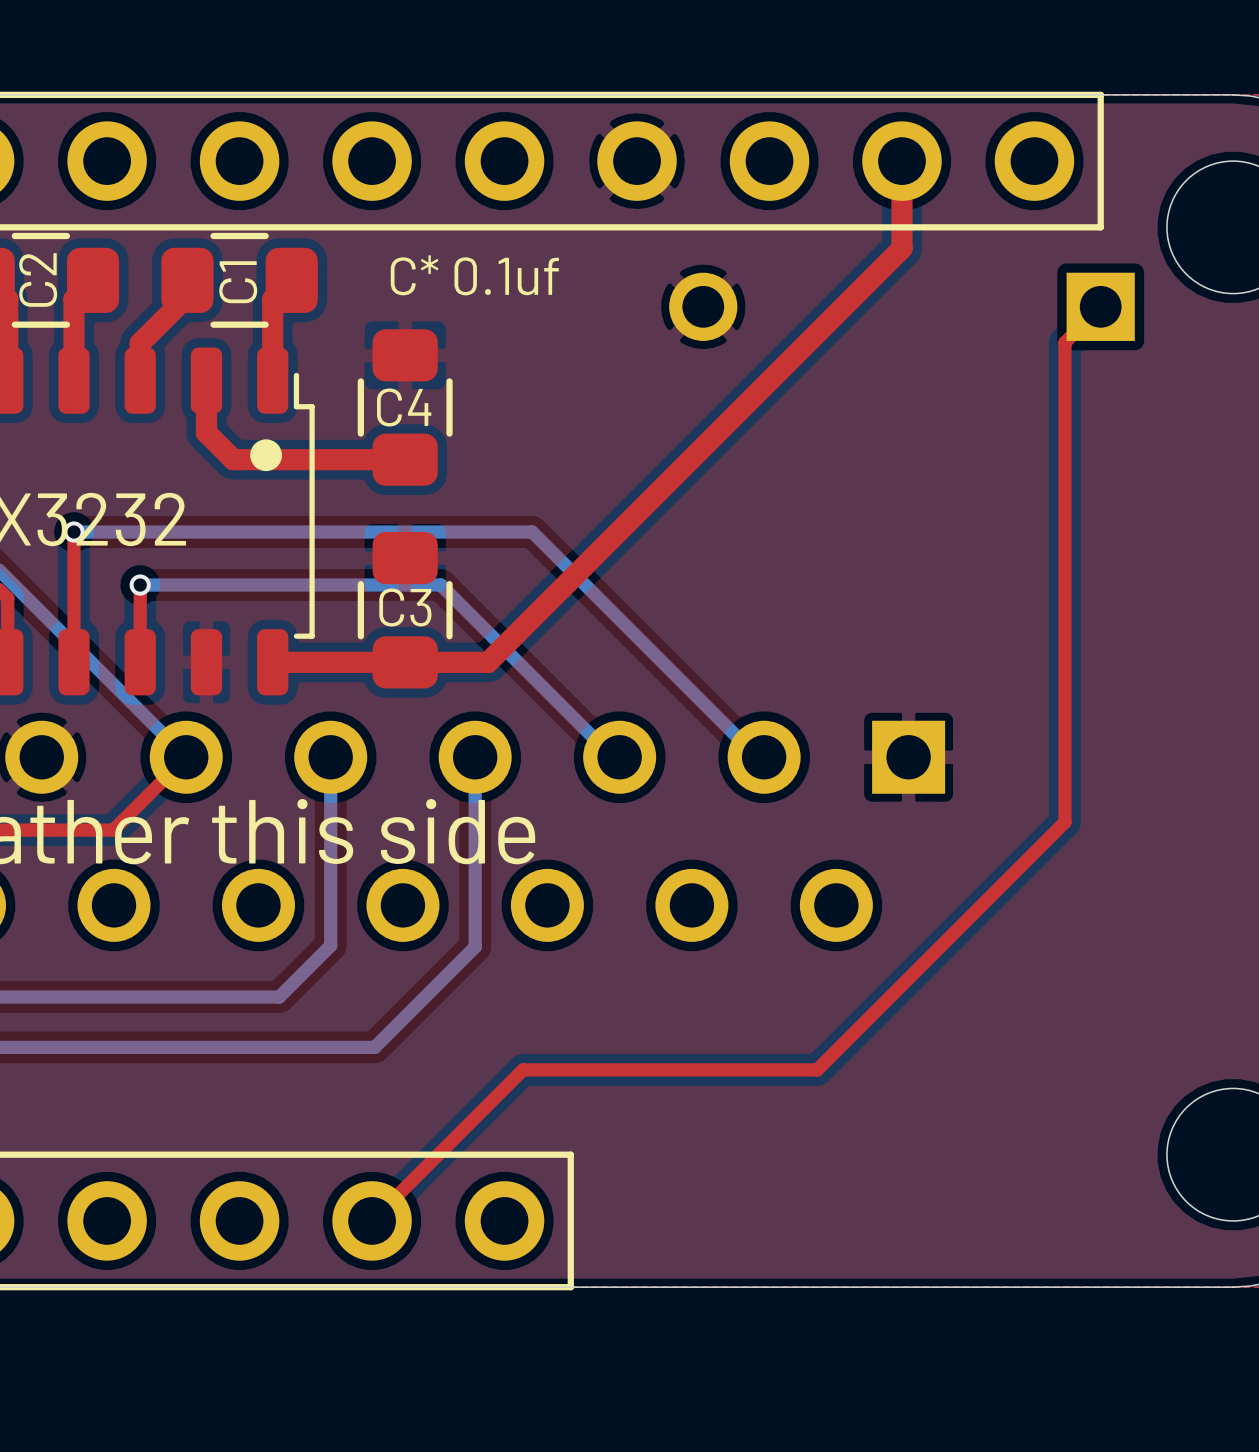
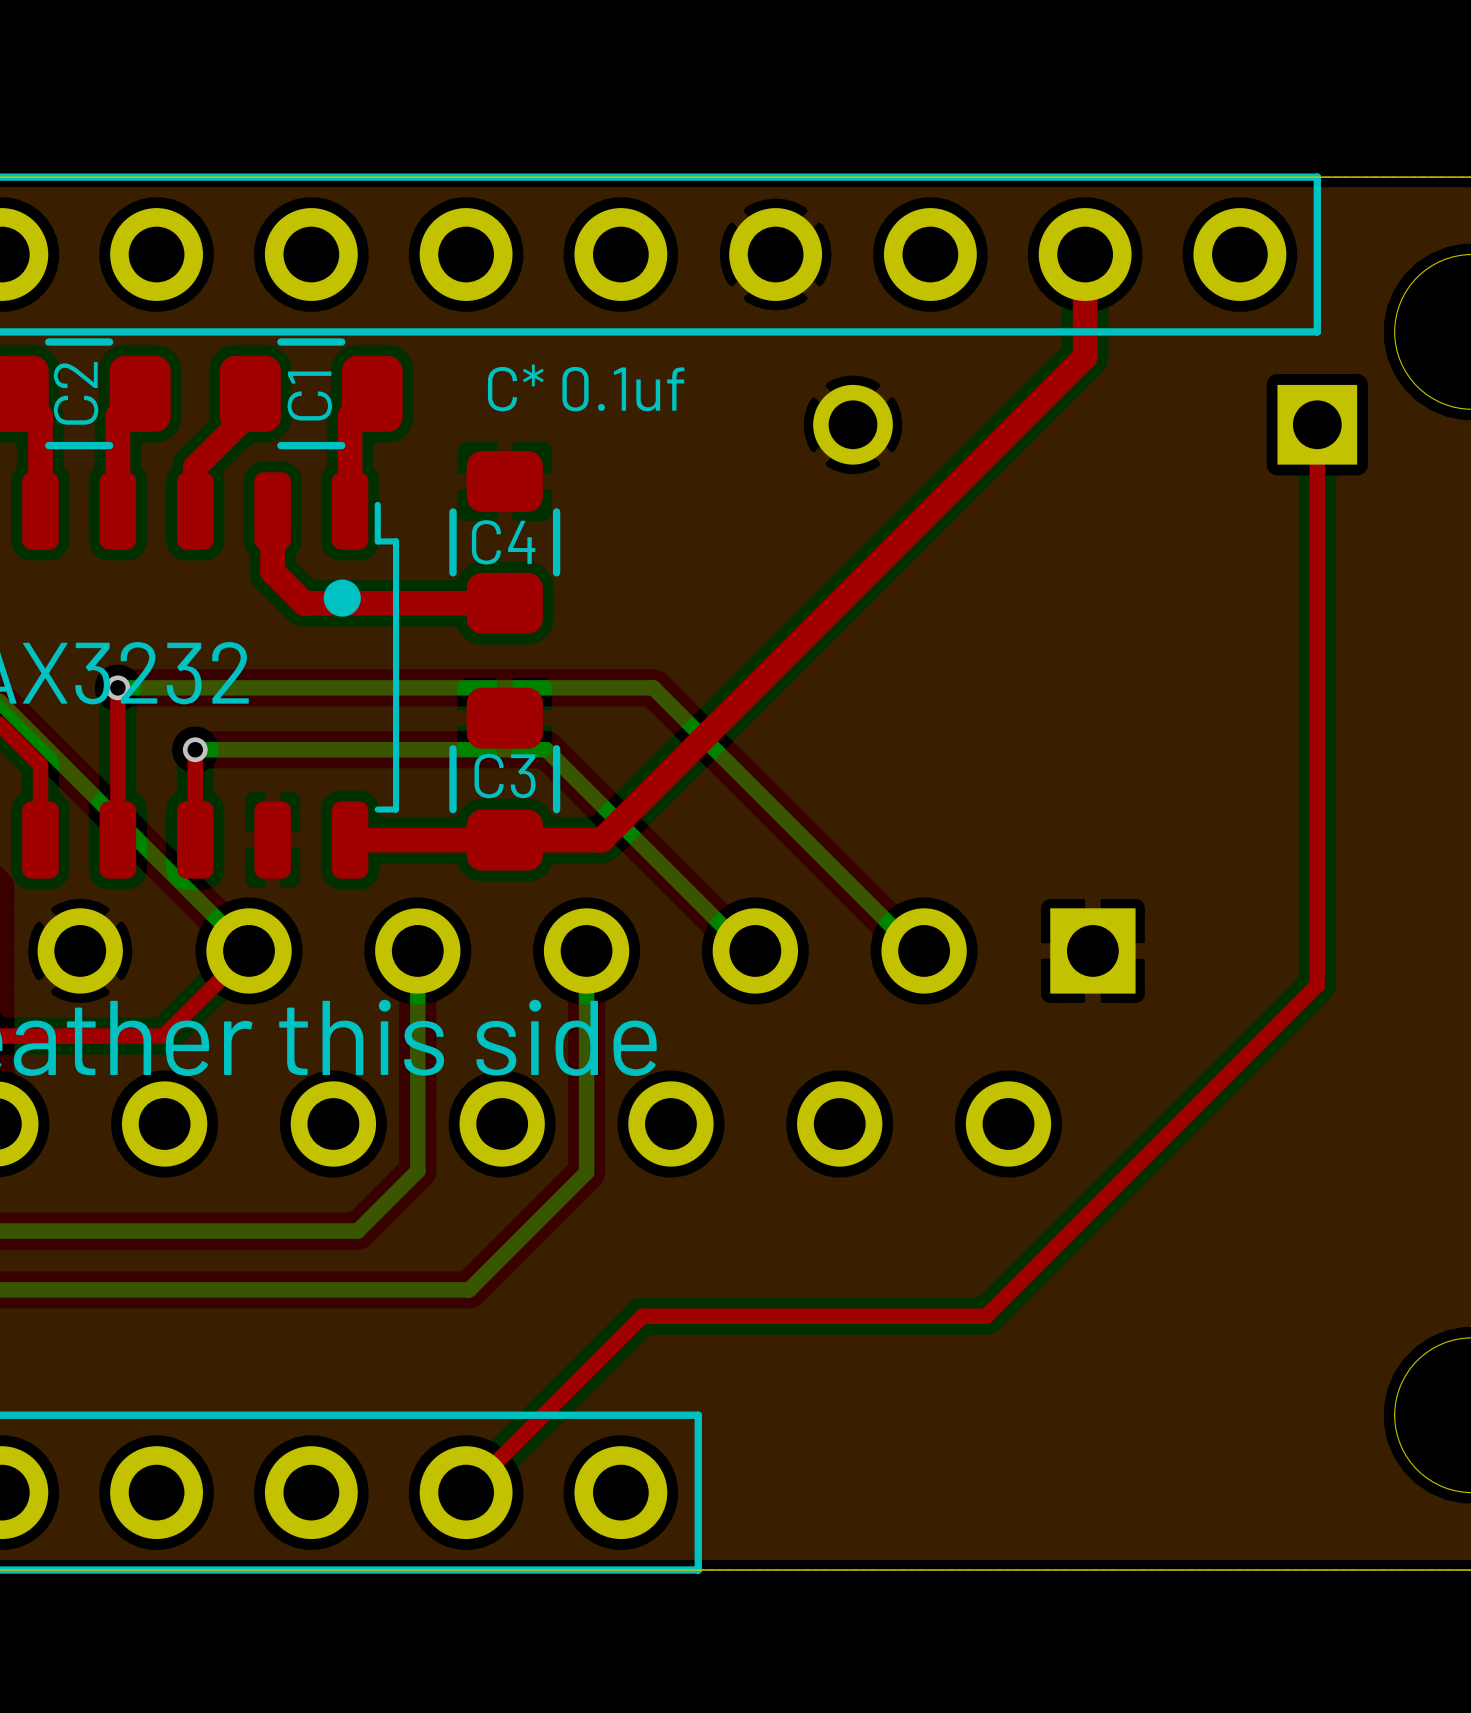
top track: (1100, 306) (1064, 342) (1064, 822) -> (1317, 424) (1317, 985) (1275, 1026)

